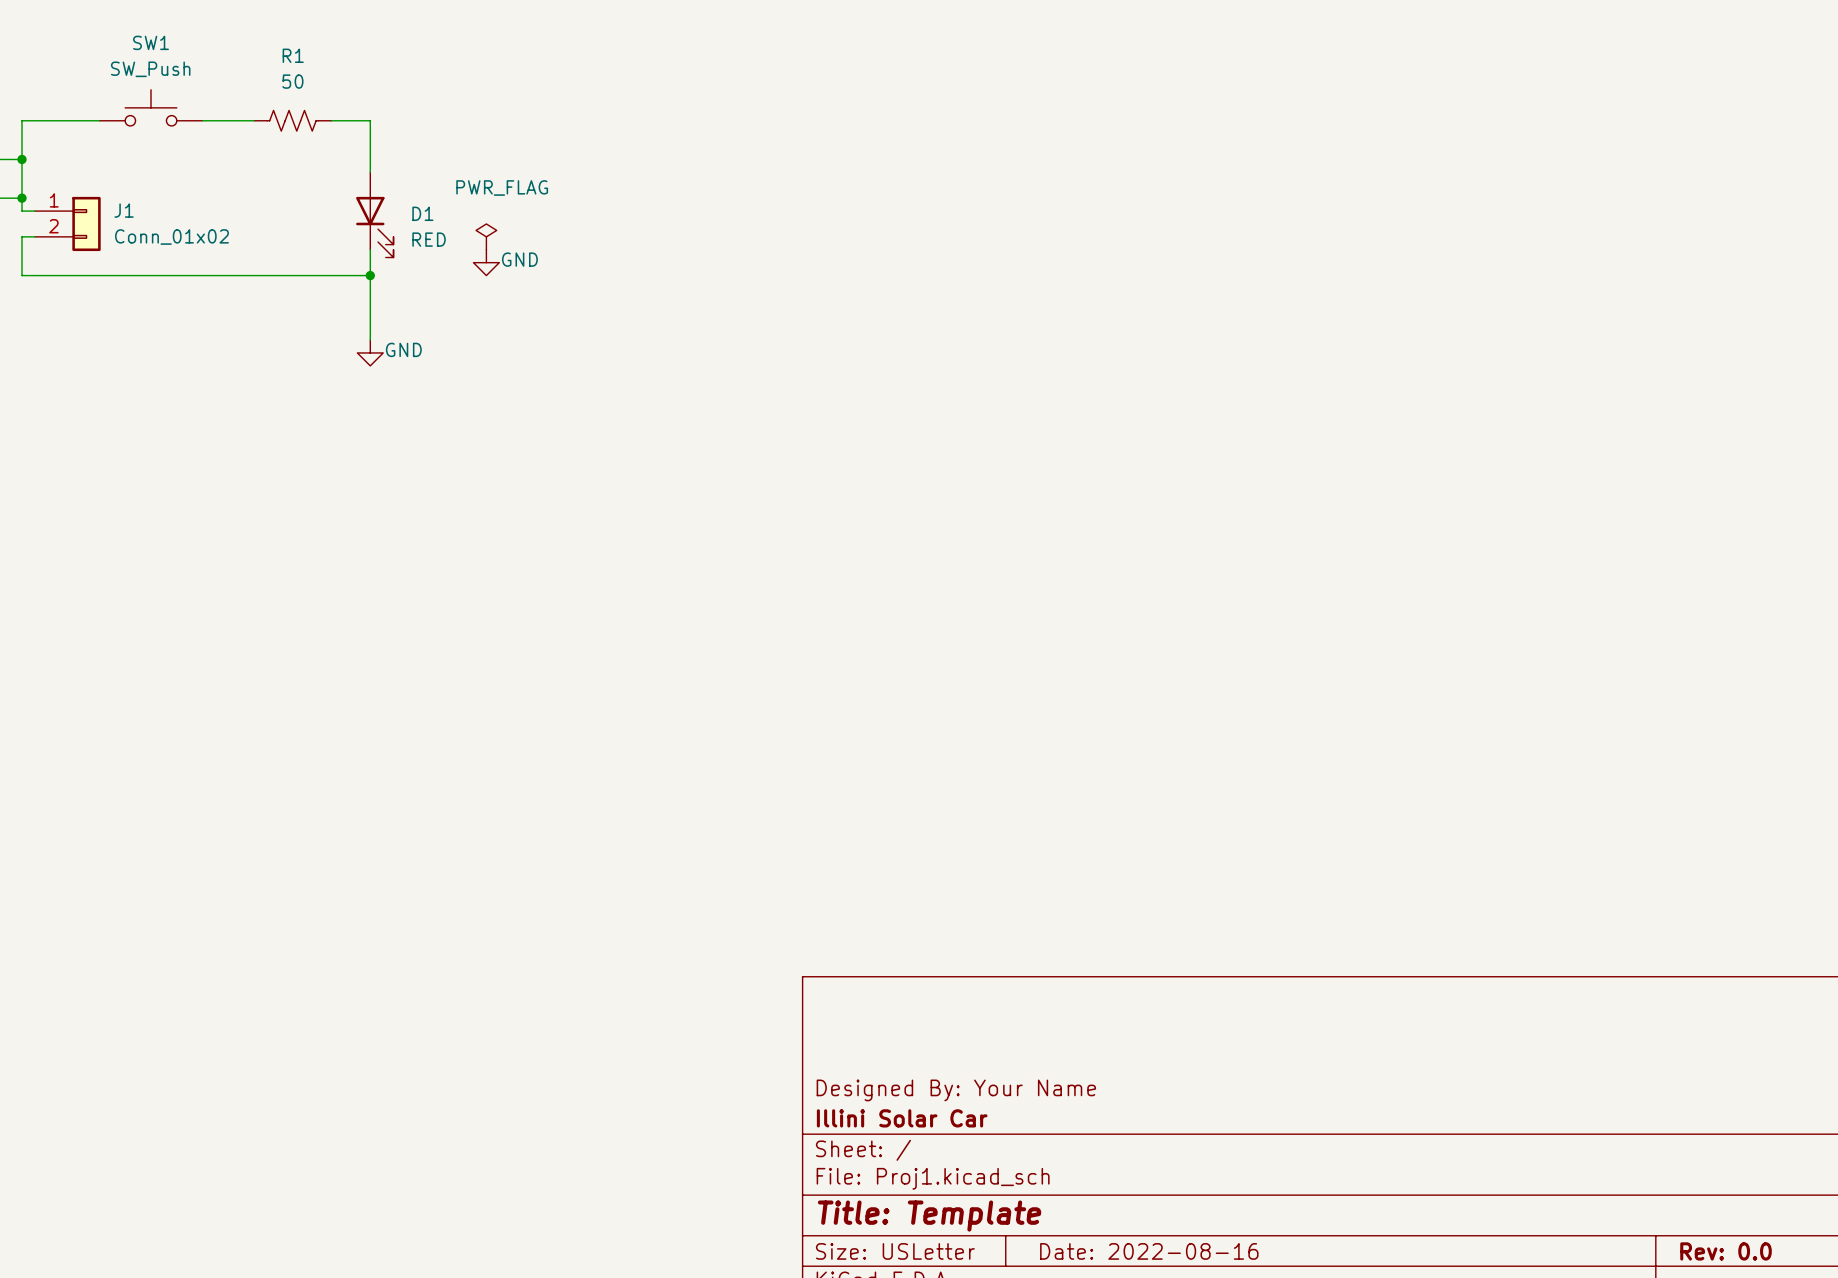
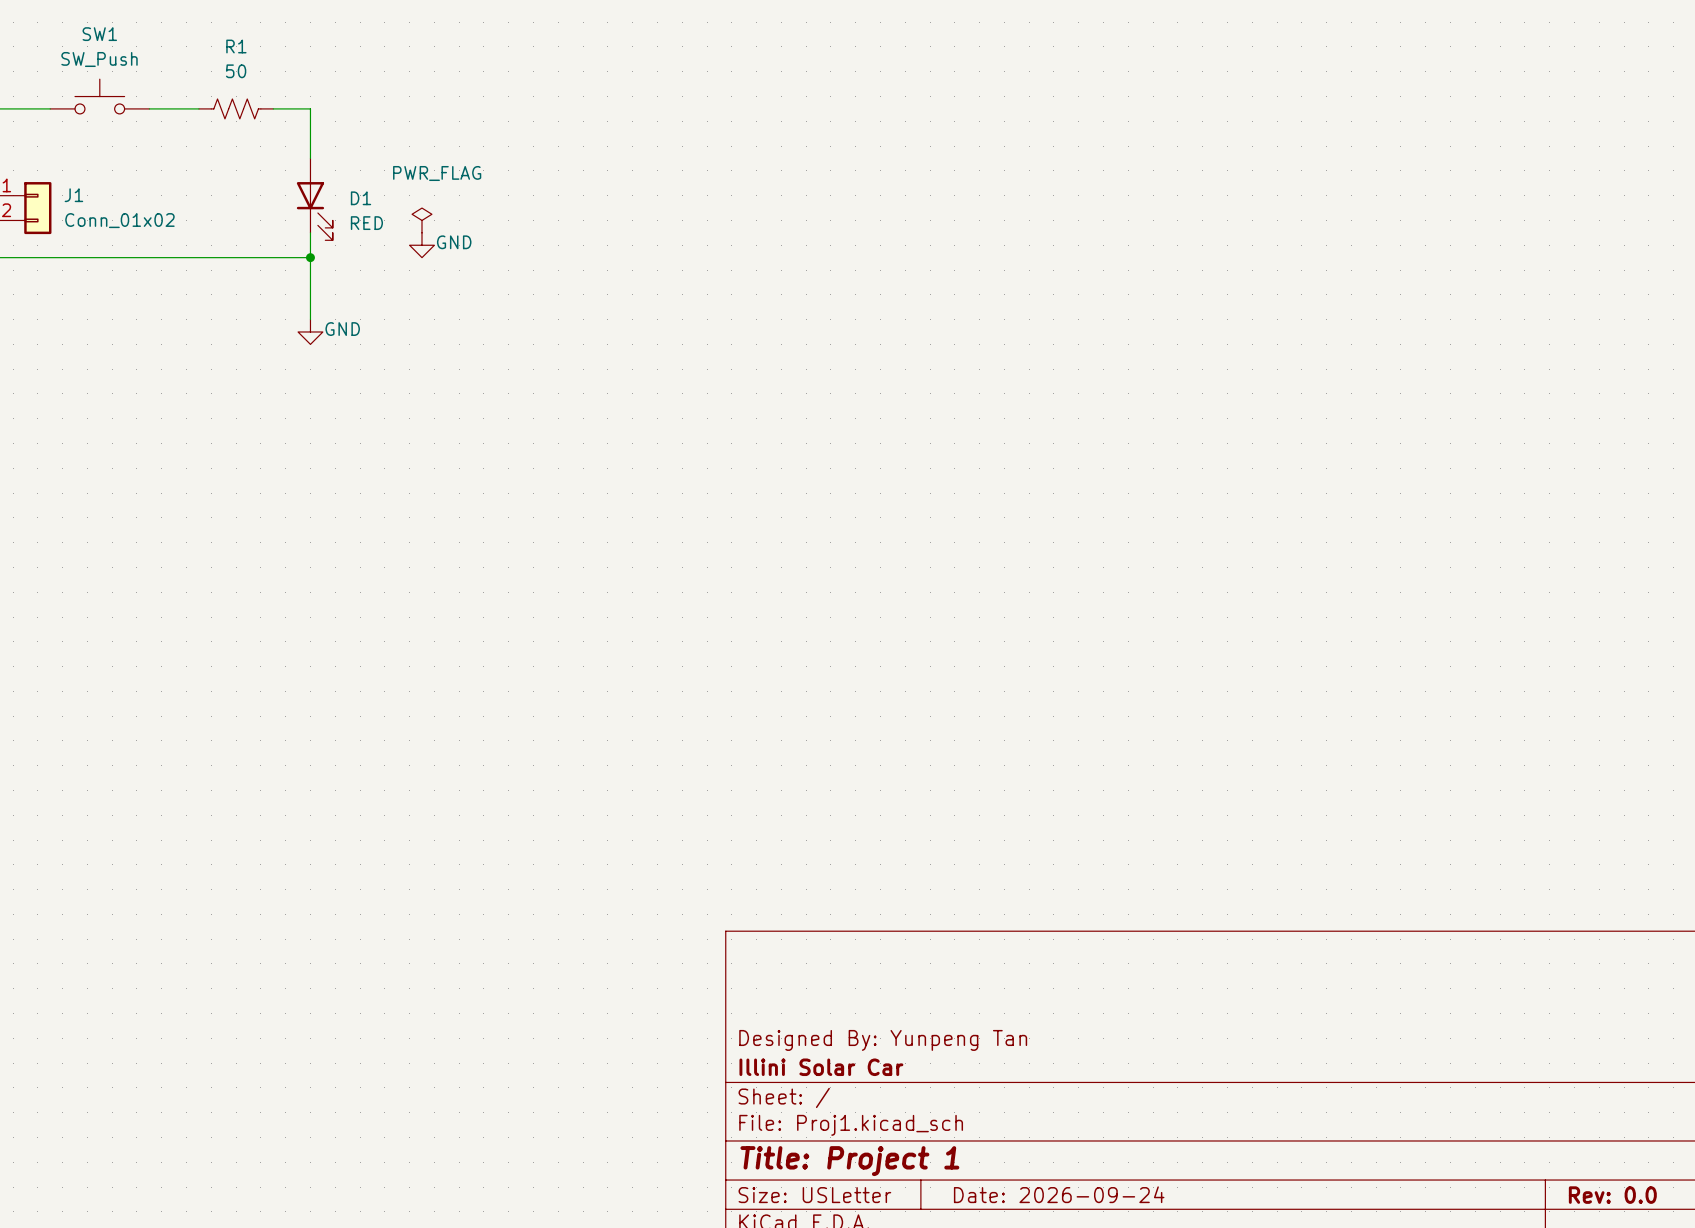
title block: Designed By: Your Name (956, 1090) -> Designed By: Yunpeng Tan (883, 1040)
title block: Title: Template (929, 1216) -> Title: Project 1 (849, 1161)
title block: Date: 2022-08-16 (1149, 1251) -> Date: 2026-09-24 (1059, 1194)

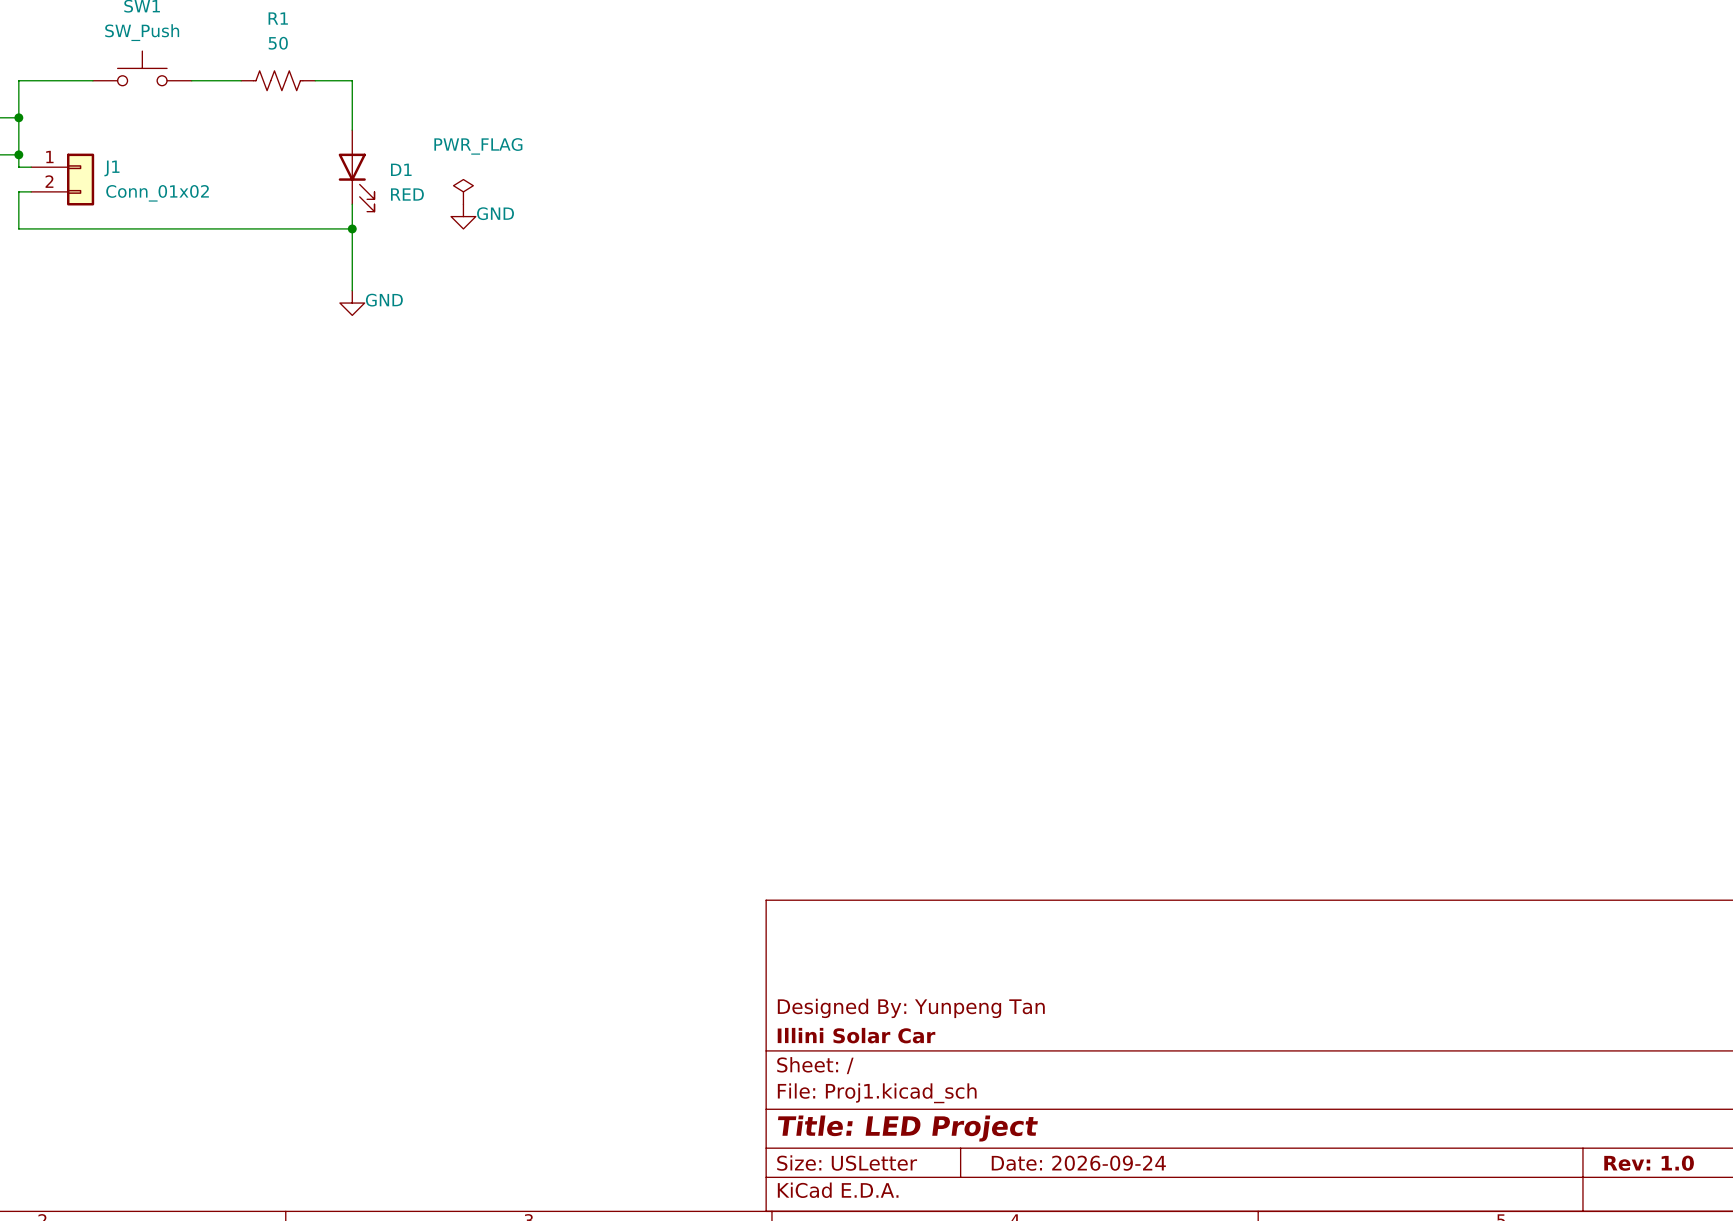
title block: Title: Project 1 (849, 1161) -> Title: LED Project (907, 1128)
title block: Rev: 0.0 (1612, 1195) -> Rev: 1.0 (1649, 1163)

